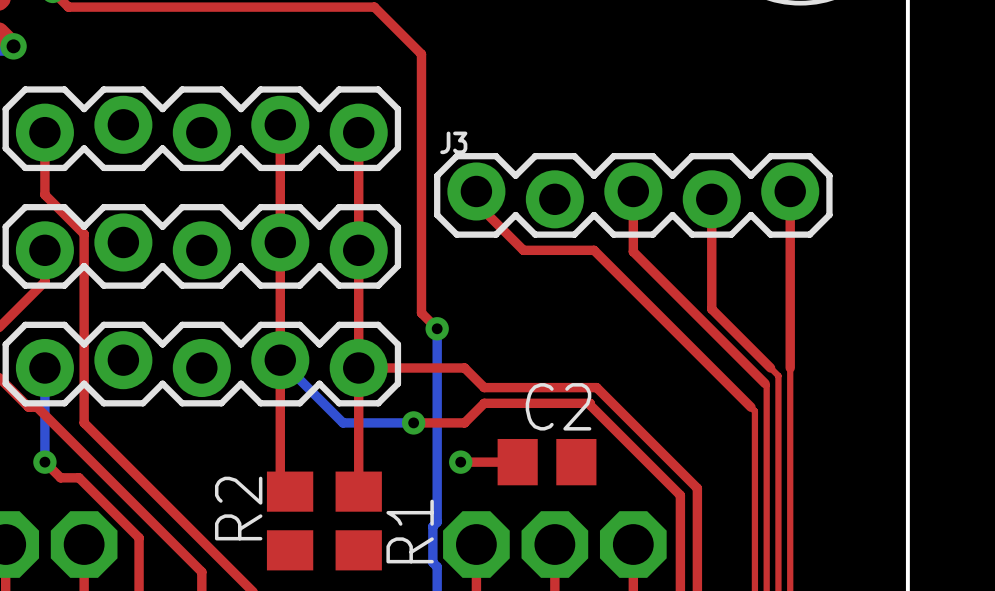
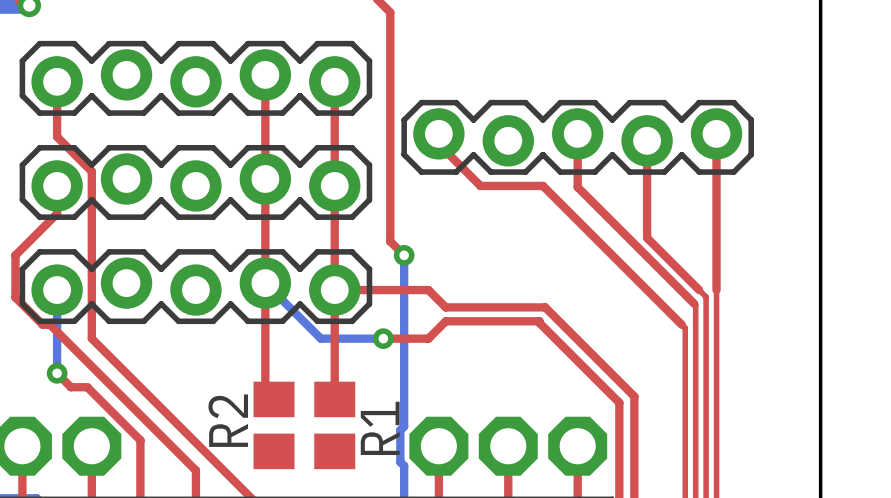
J3 name: J3 (453, 142) -> none
top track: (460, 462) (517, 462) -> none
via: (460, 462) -> none
C2: (547, 462) -> none

